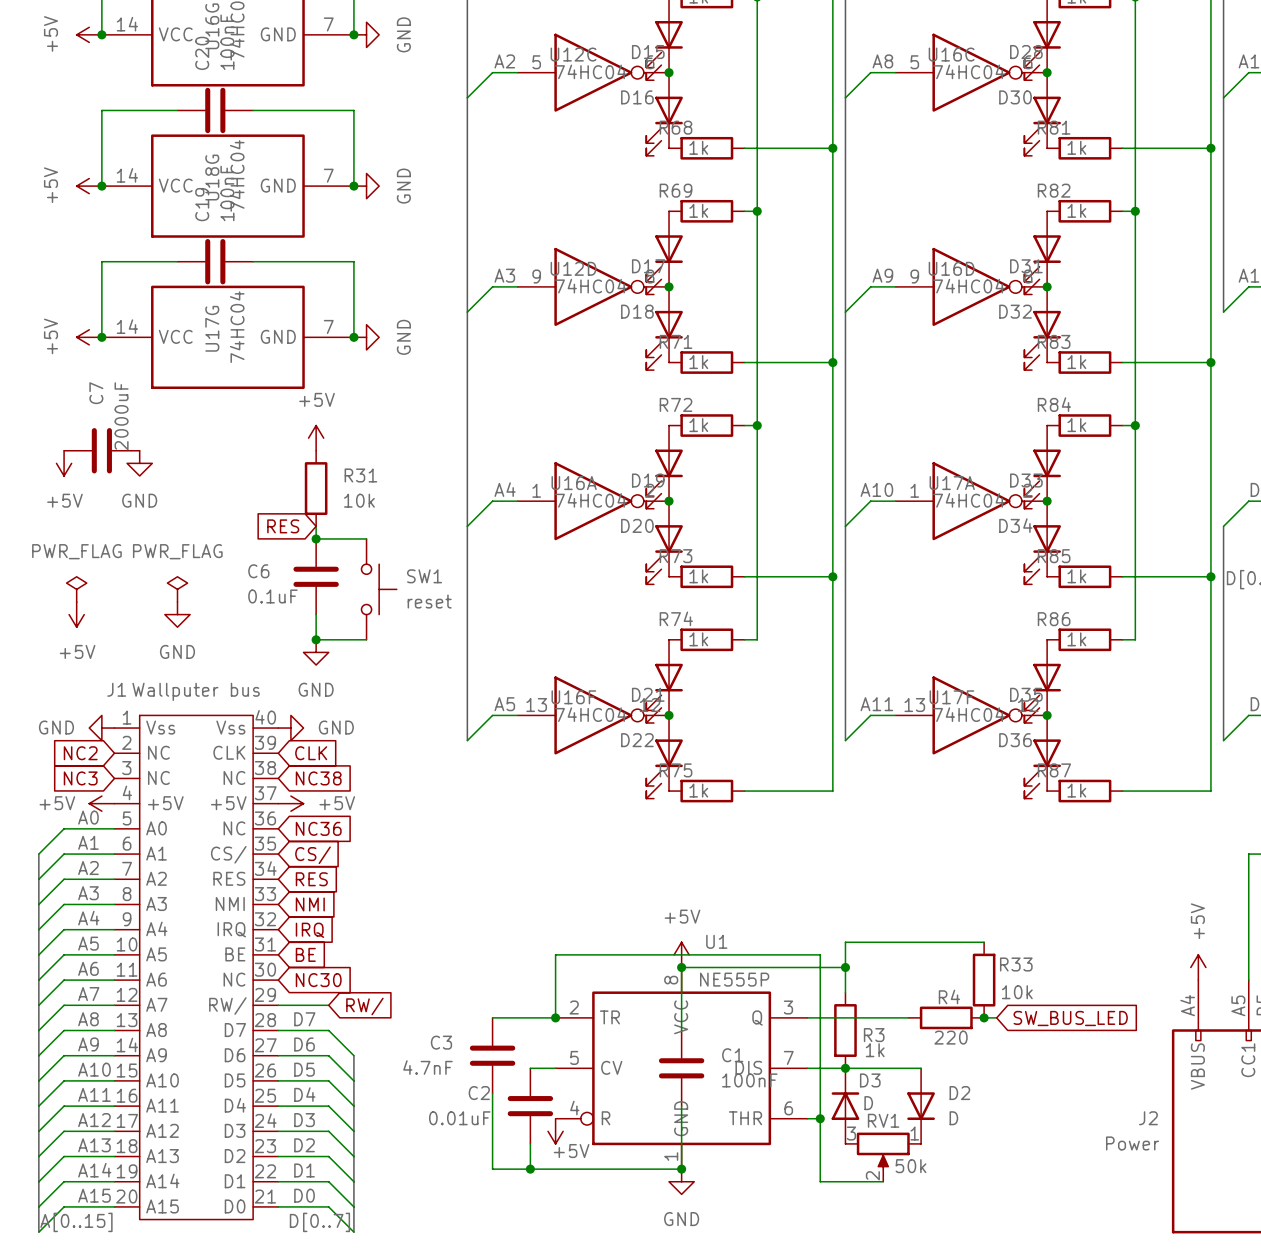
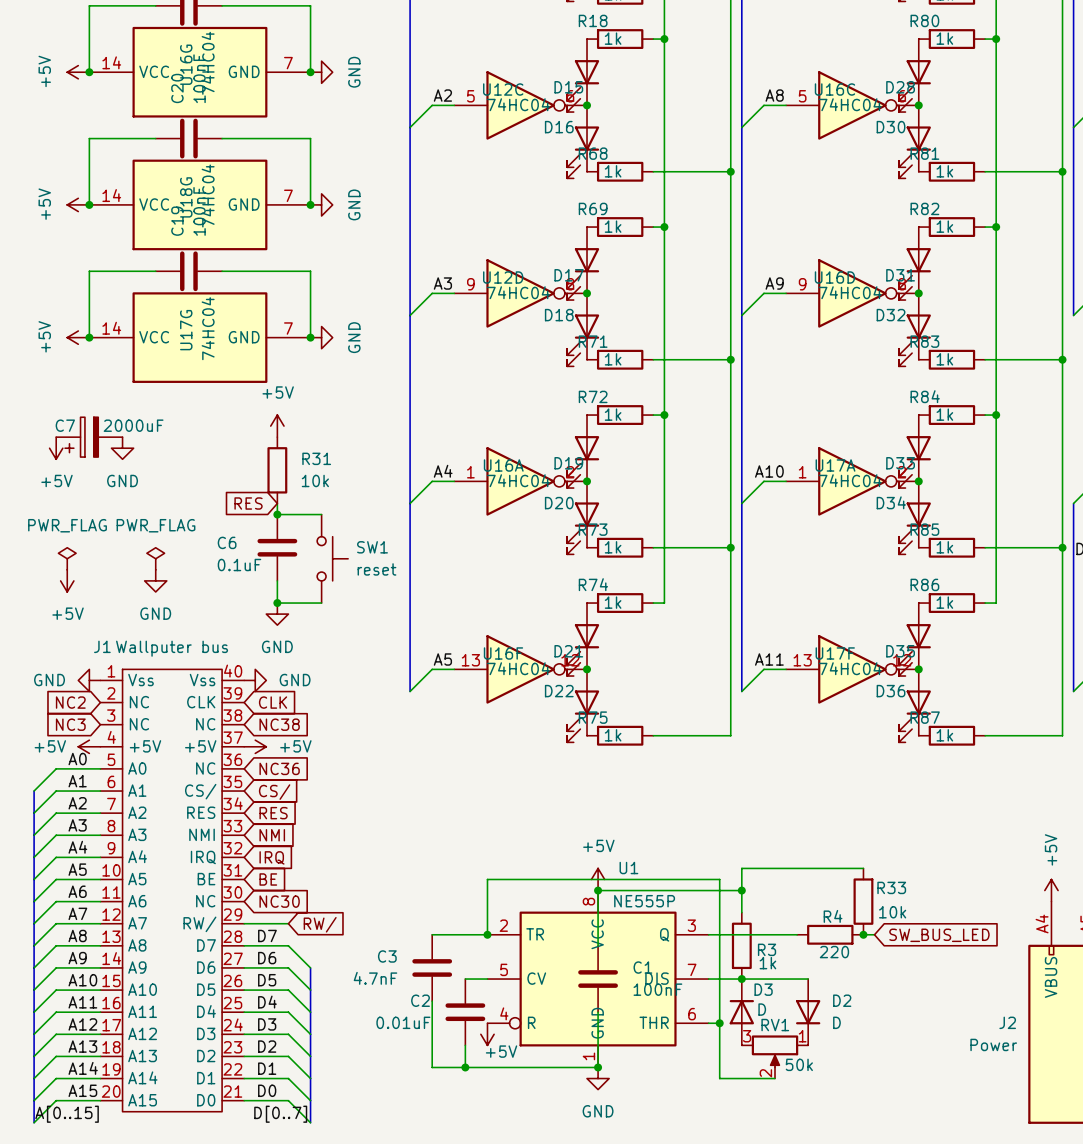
C7 name position: C7 (96, 393) -> C7 (65, 425)
C7 value position: 2000uF (121, 416) -> 2000uF (133, 425)
C7 symbol: [64, 428, 140, 474] -> [56, 417, 123, 458]

